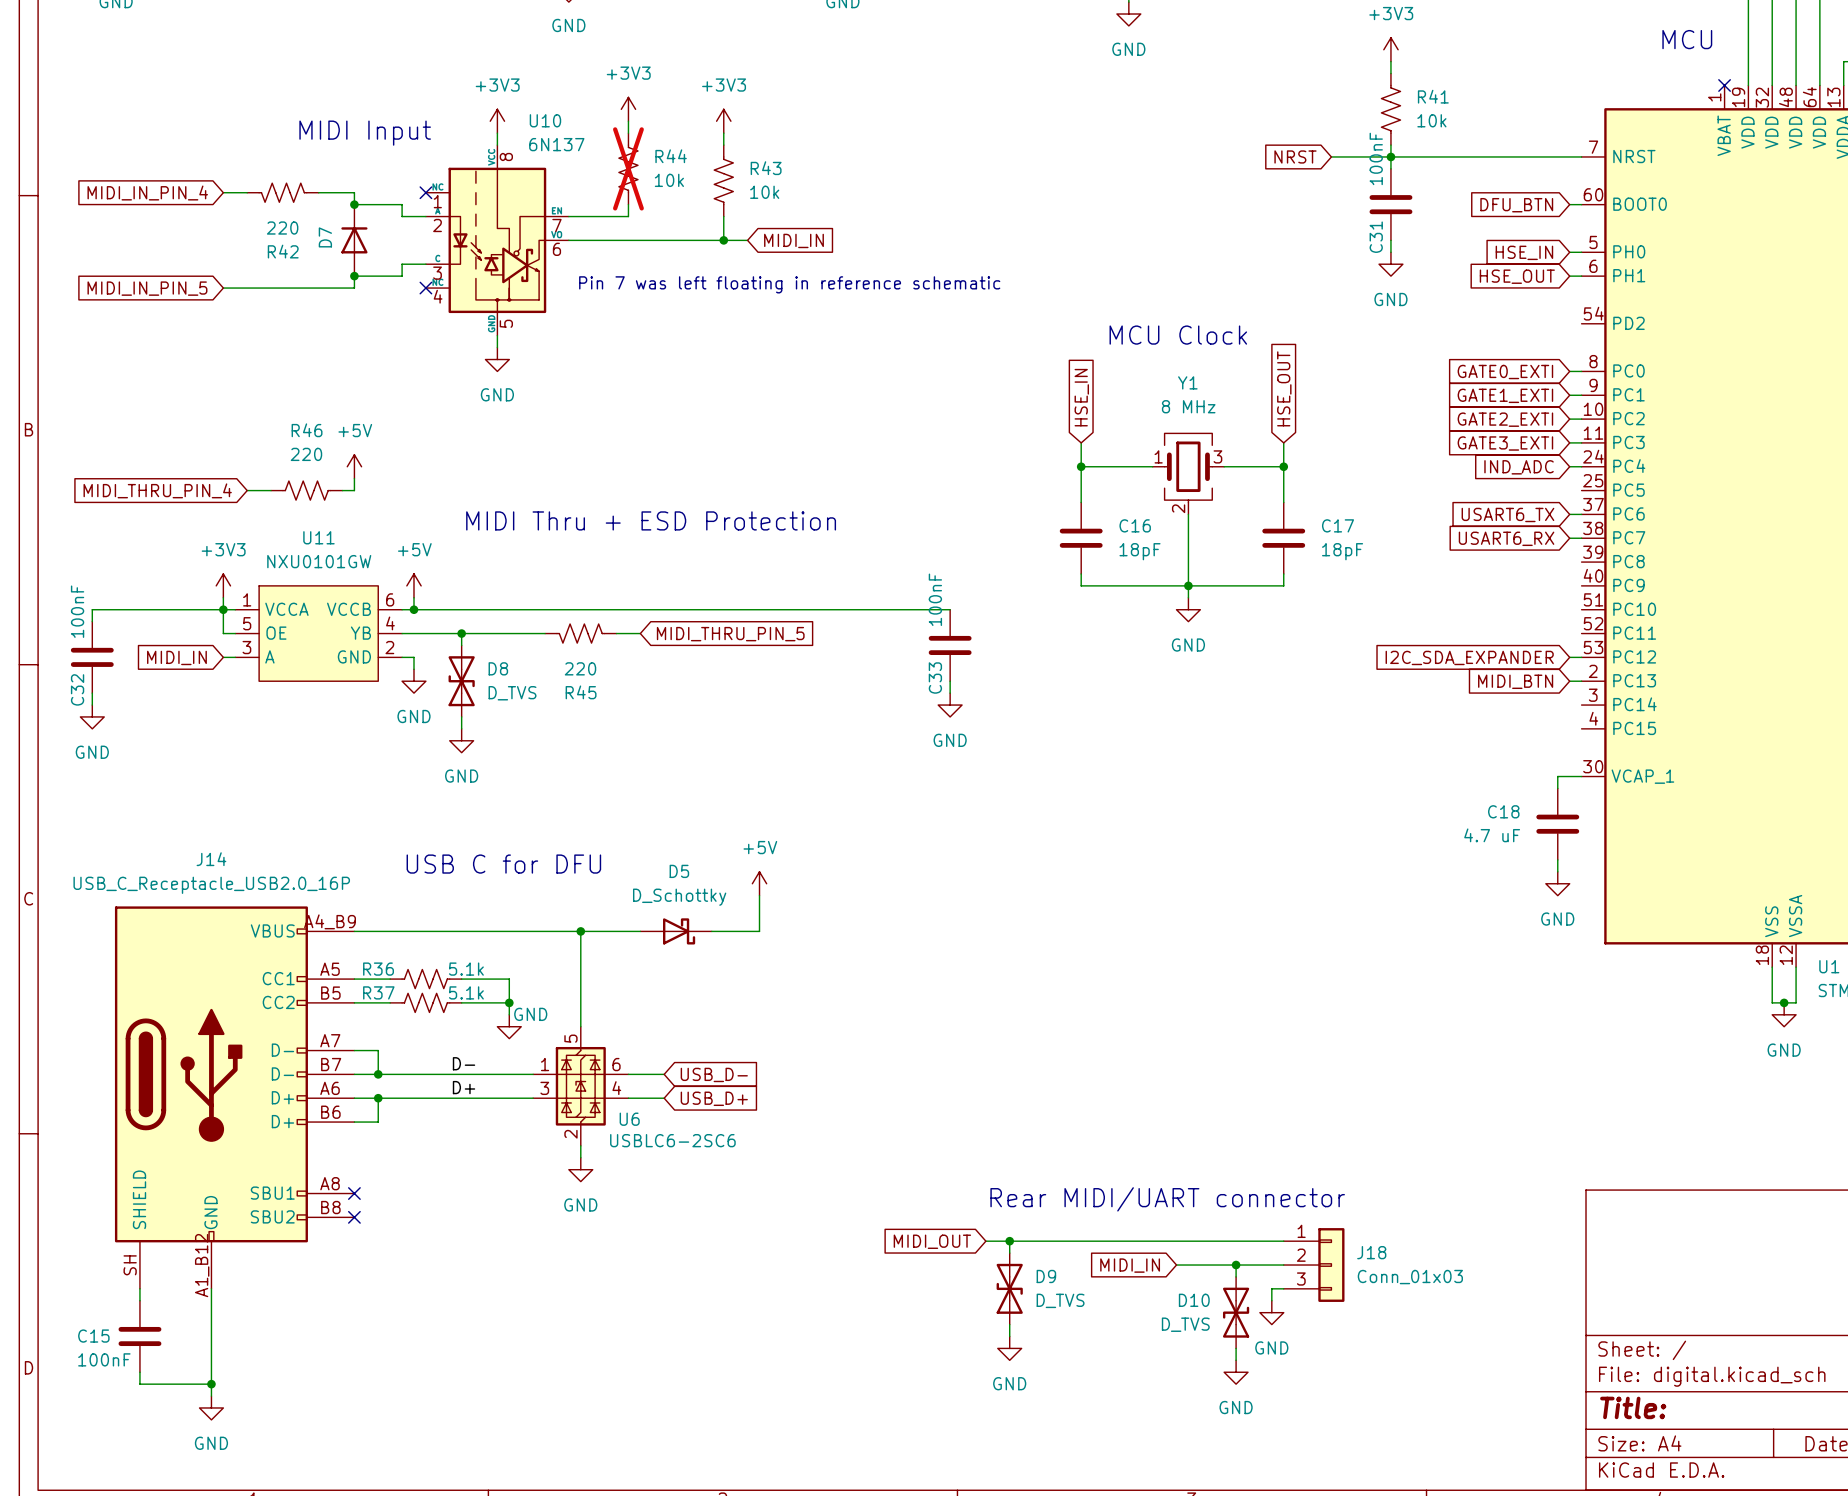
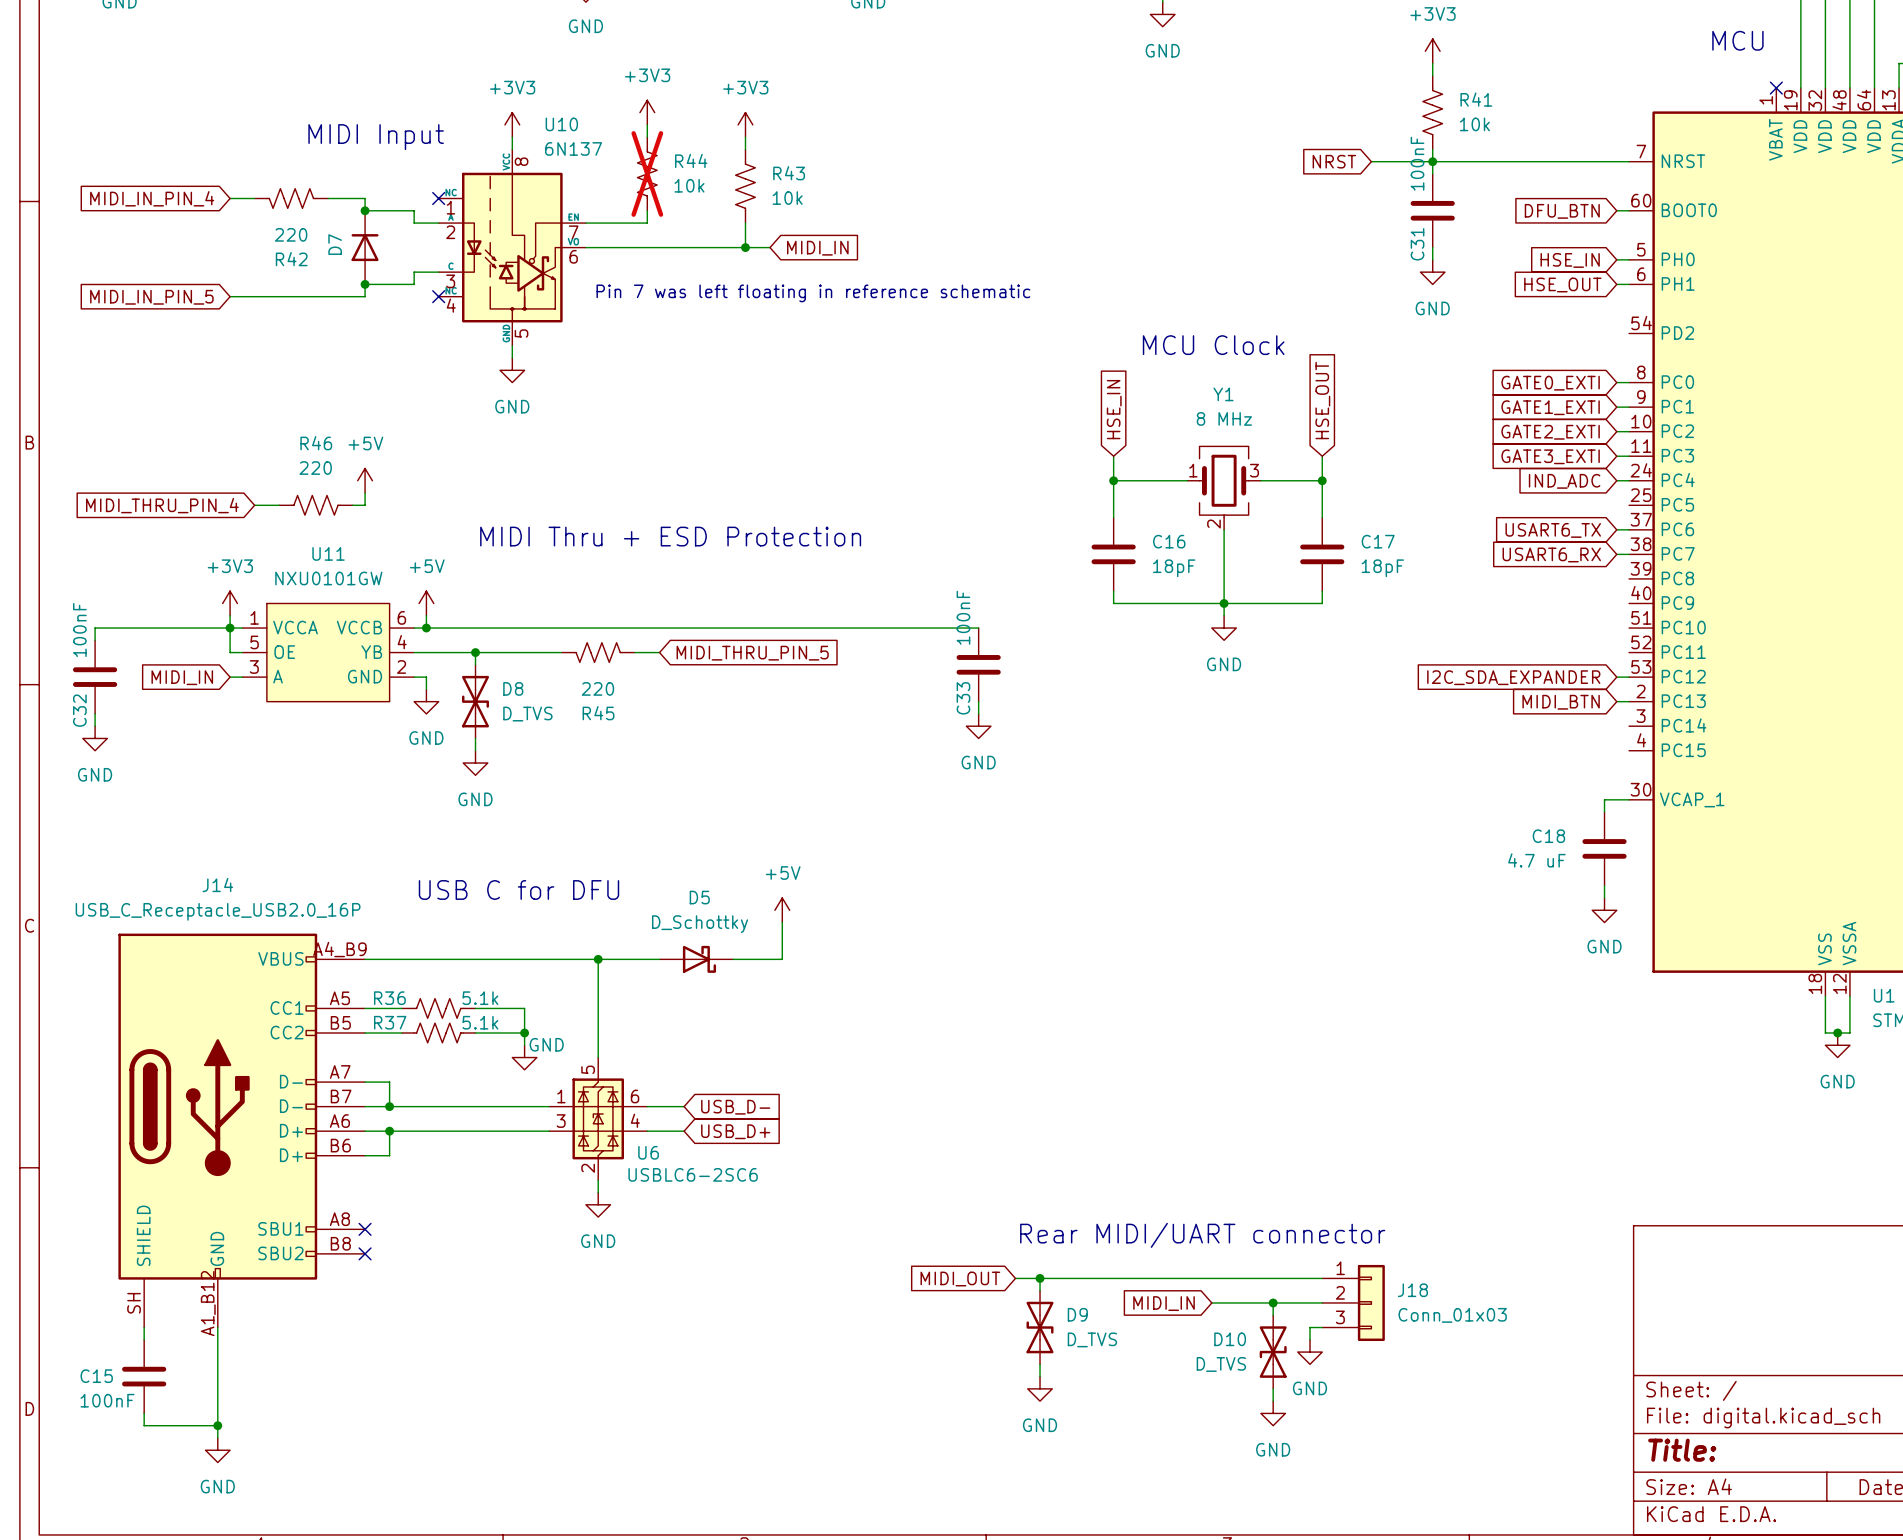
label: D- (464, 1063) -> none
label: D+ (464, 1087) -> none

